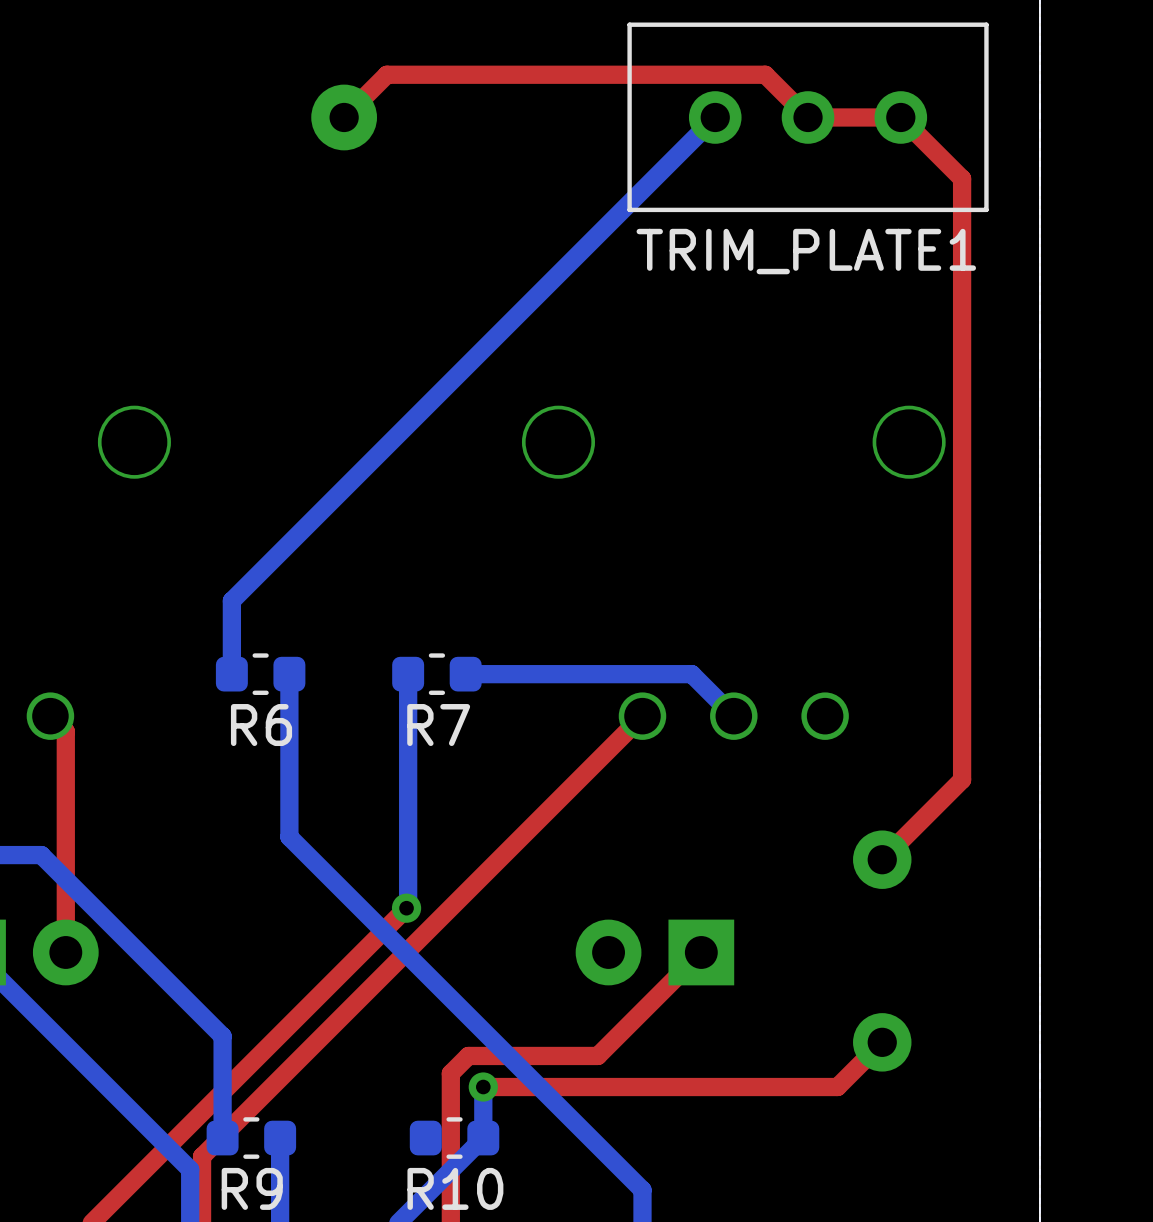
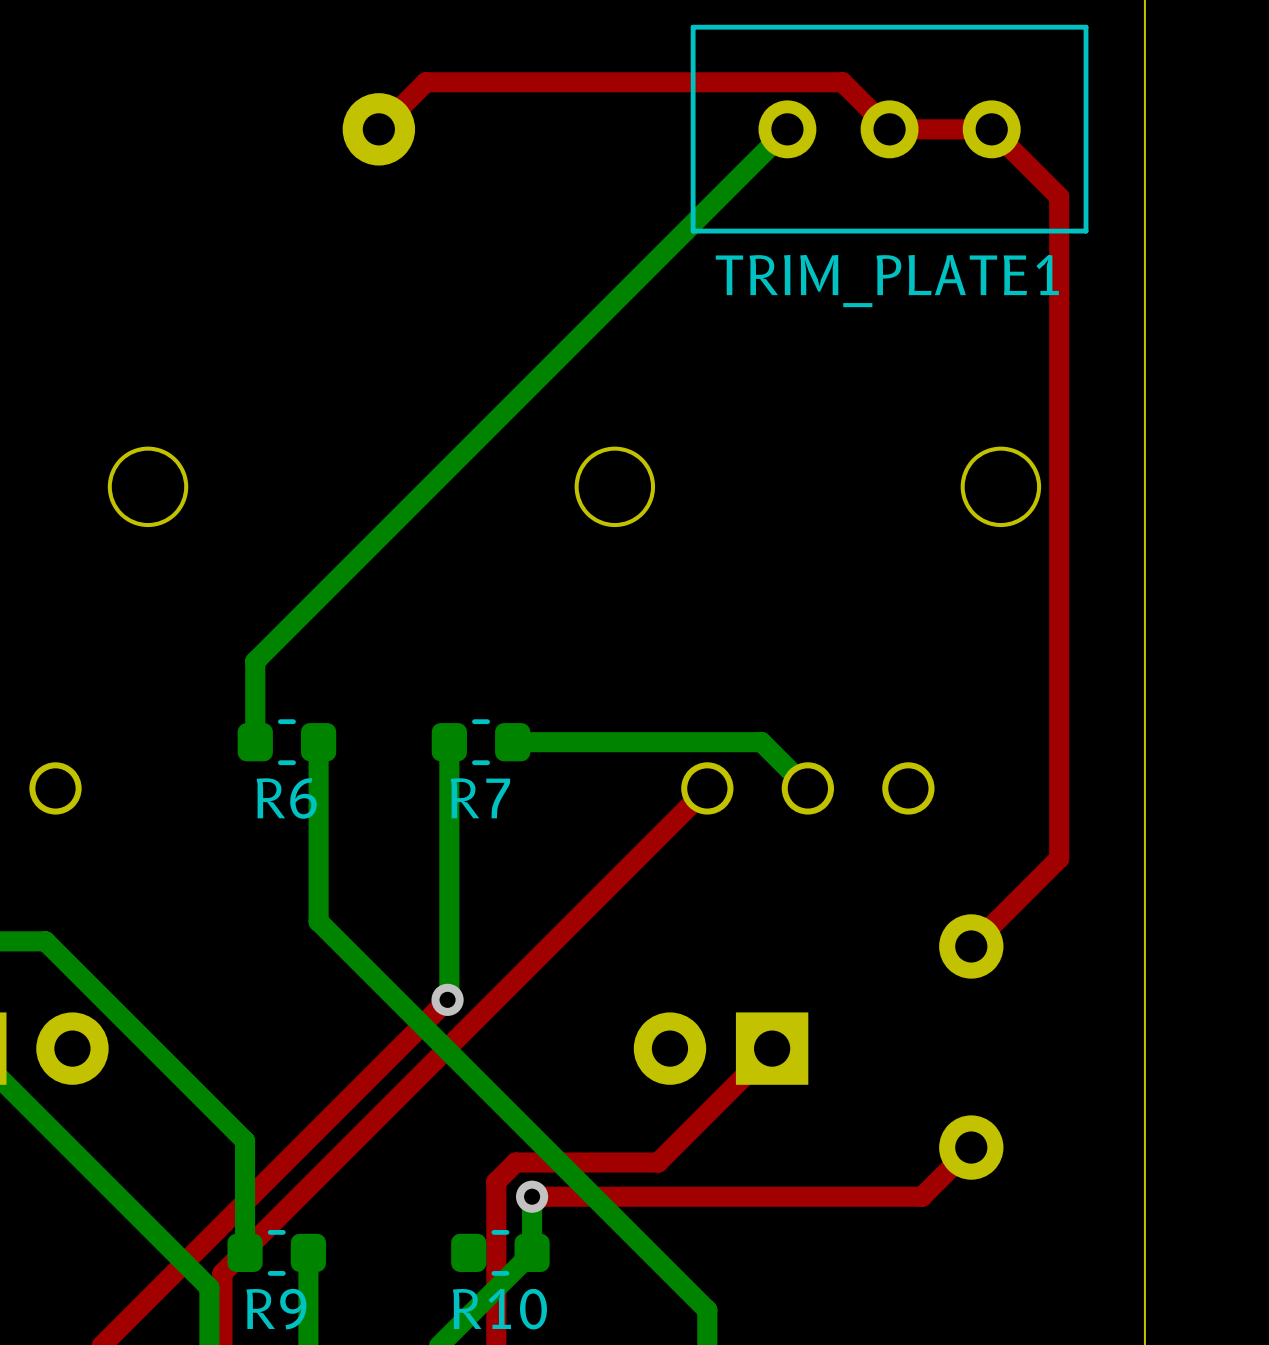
top track: (50, 716) (65, 731) (65, 952) -> none

